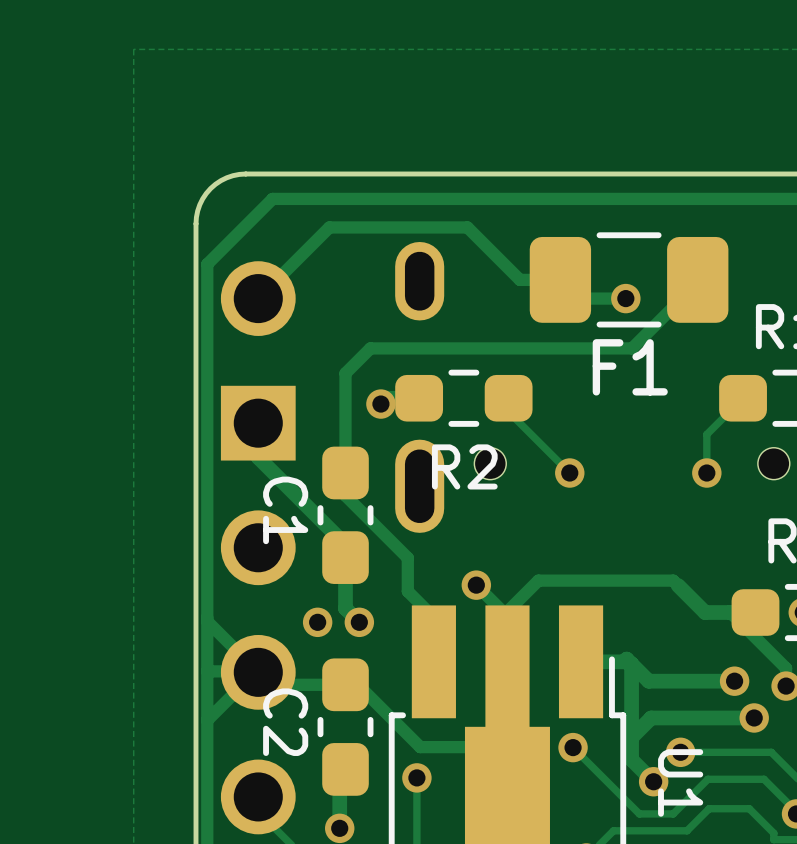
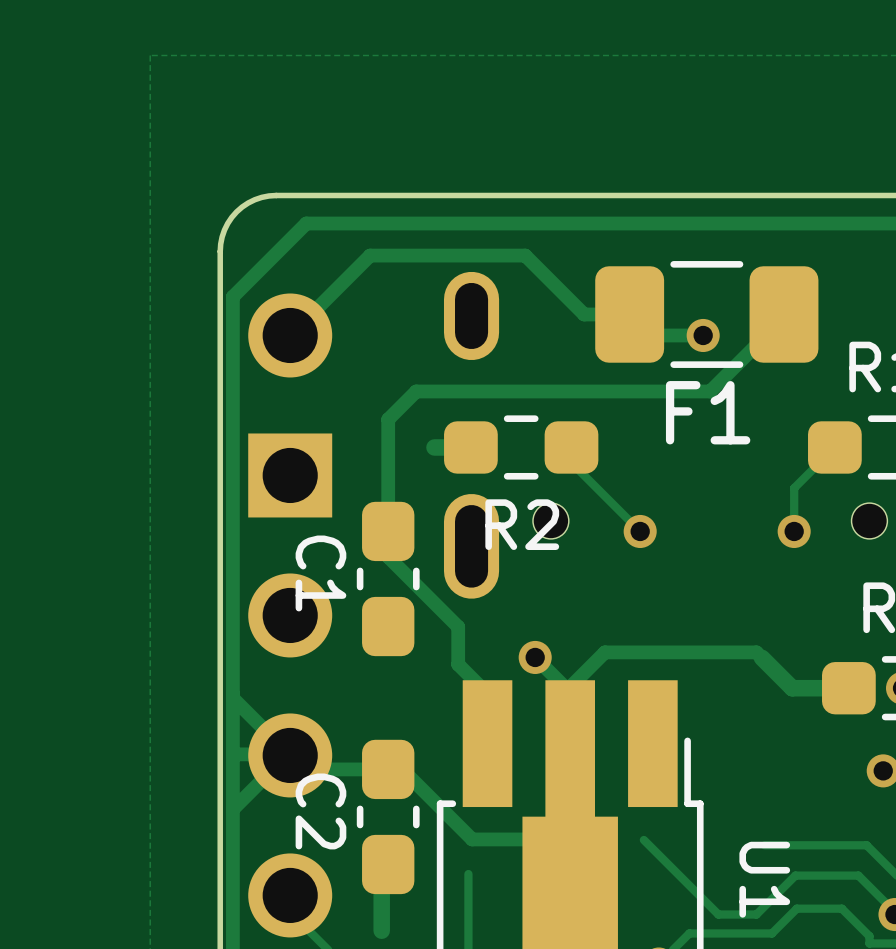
via: (380, 404) -> none
track: (258, 423) (258, 457) (345, 544) (345, 608) (359, 622) -> none
track: (730, 612) (786, 668) (786, 686) -> none
via: (317, 622) -> none
via: (359, 622) -> none
track: (581, 661) (623, 661) (626, 659) (648, 681) (734, 681) -> none
track: (631, 664) (631, 759) (653, 781) -> none
via: (734, 681) -> none
track: (754, 717) (651, 717) (631, 737) -> none
via: (754, 717) -> none
via: (573, 747) -> none
via: (680, 752) -> none
via: (416, 777) -> none
via: (653, 781) -> none
via: (339, 828) -> none

